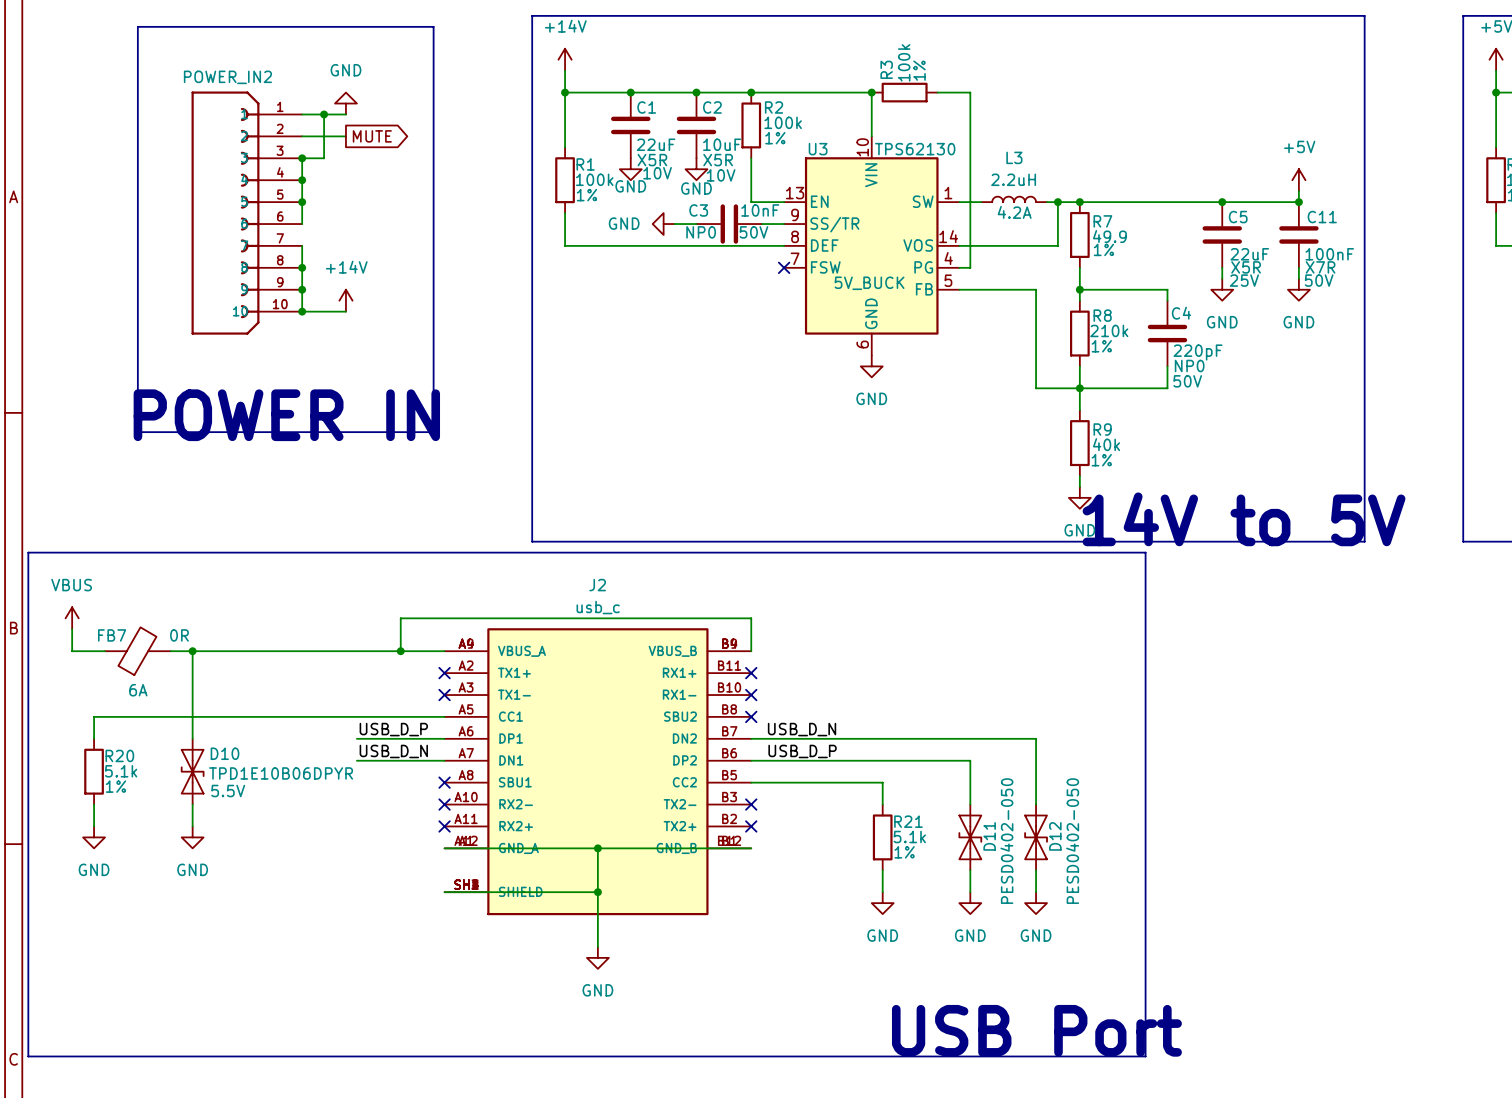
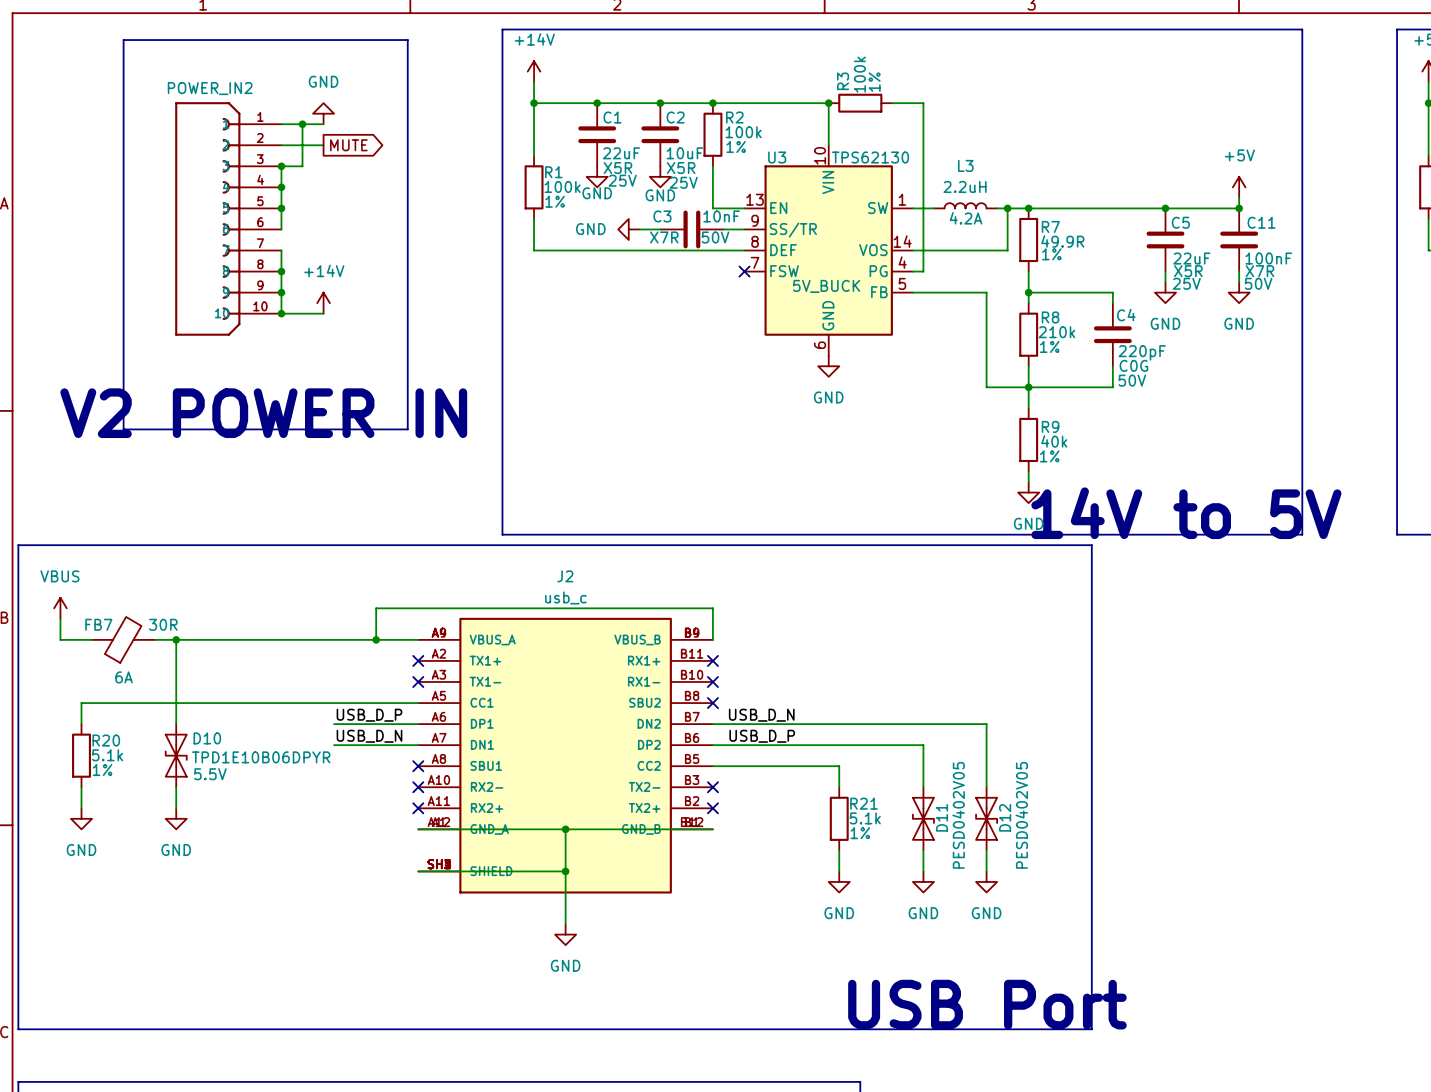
C1 text: 10V (657, 173) -> 25V (622, 180)
C2 text: 10V (721, 175) -> 25V (683, 182)
C3 text: NP0 (701, 232) -> X7R (664, 237)
R7 value: 49.9 (1109, 236) -> 49.9R (1062, 241)
C4 text: NP0 (1189, 366) -> C0G (1133, 365)
text: POWER IN (286, 415) -> V2 POWER IN (263, 413)
FB7 value: 0R (179, 635) -> 30R (163, 624)
D11 value: PESD0402-050 (1006, 841) -> PESD0402V05 (958, 815)
D12 value: PESD0402-050 (1072, 841) -> PESD0402V05 (1021, 815)

